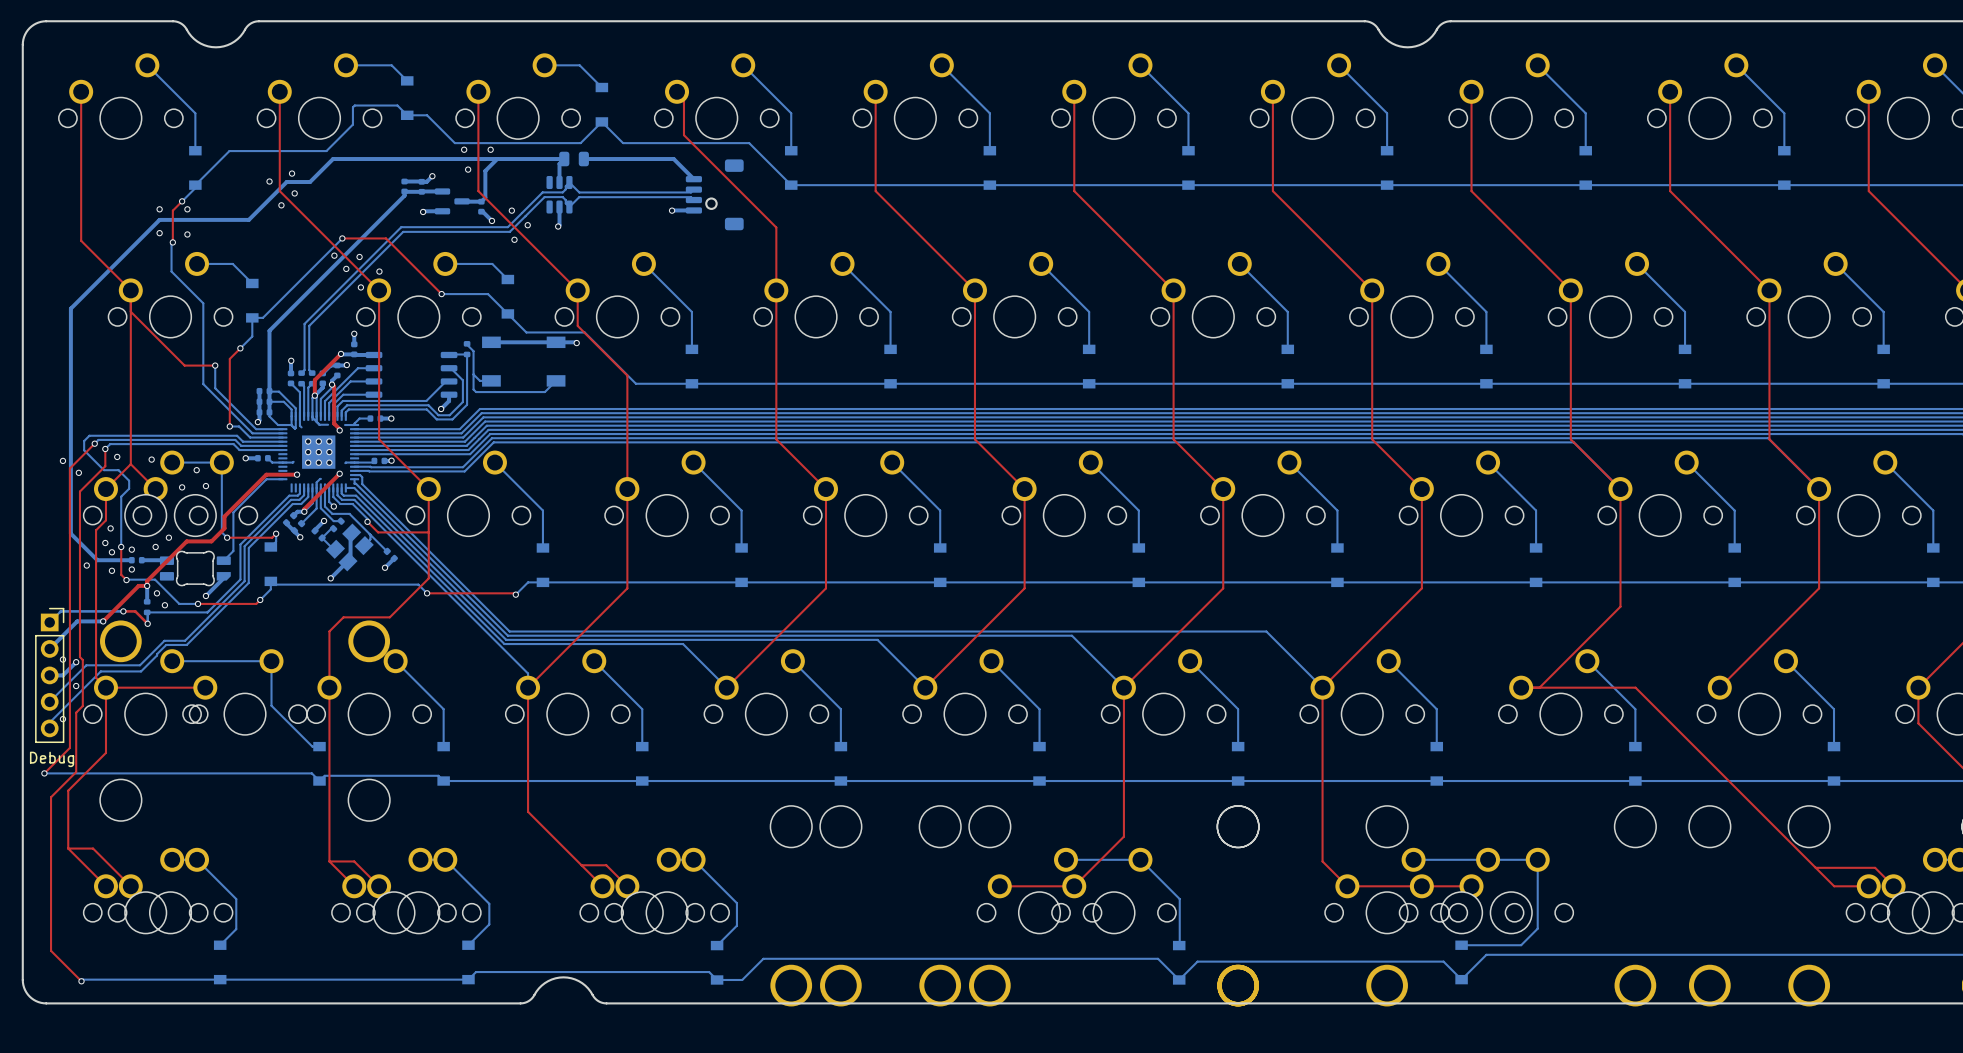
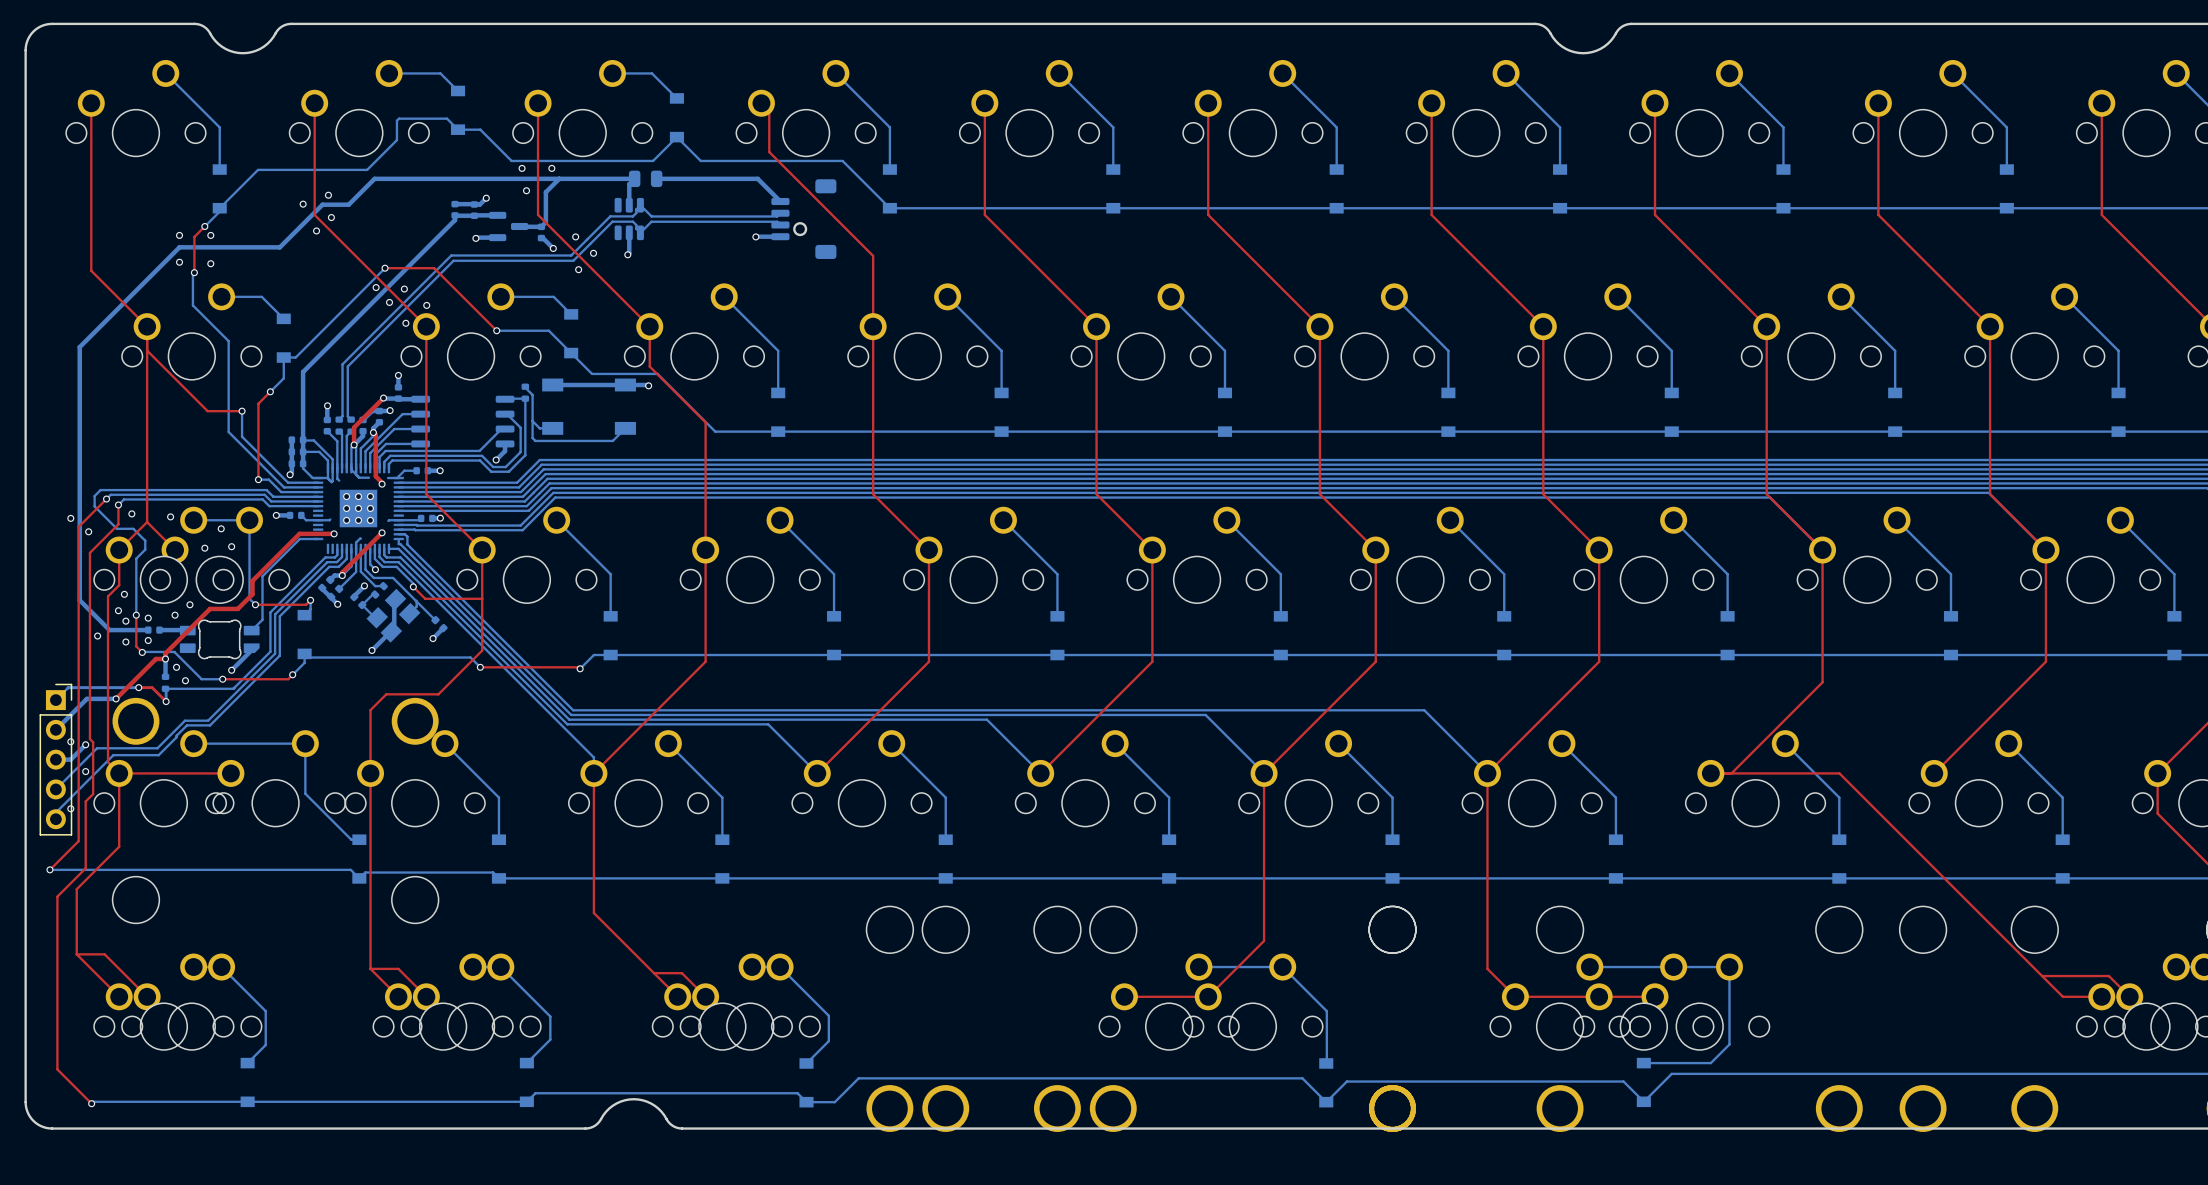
text: Debug (52, 759) -> none

